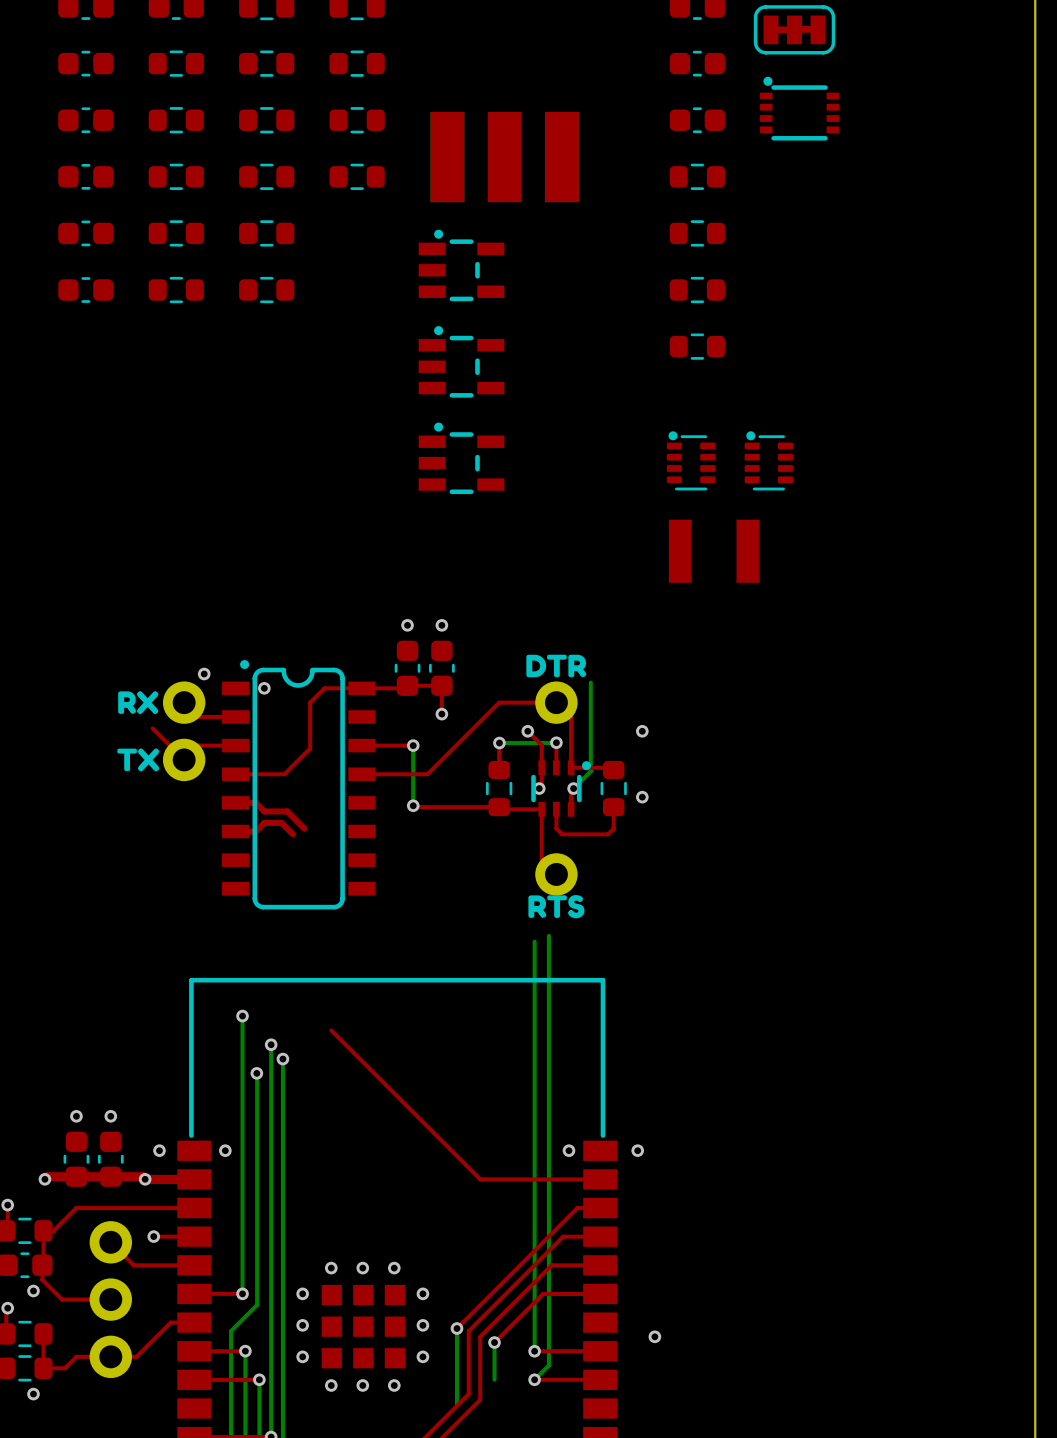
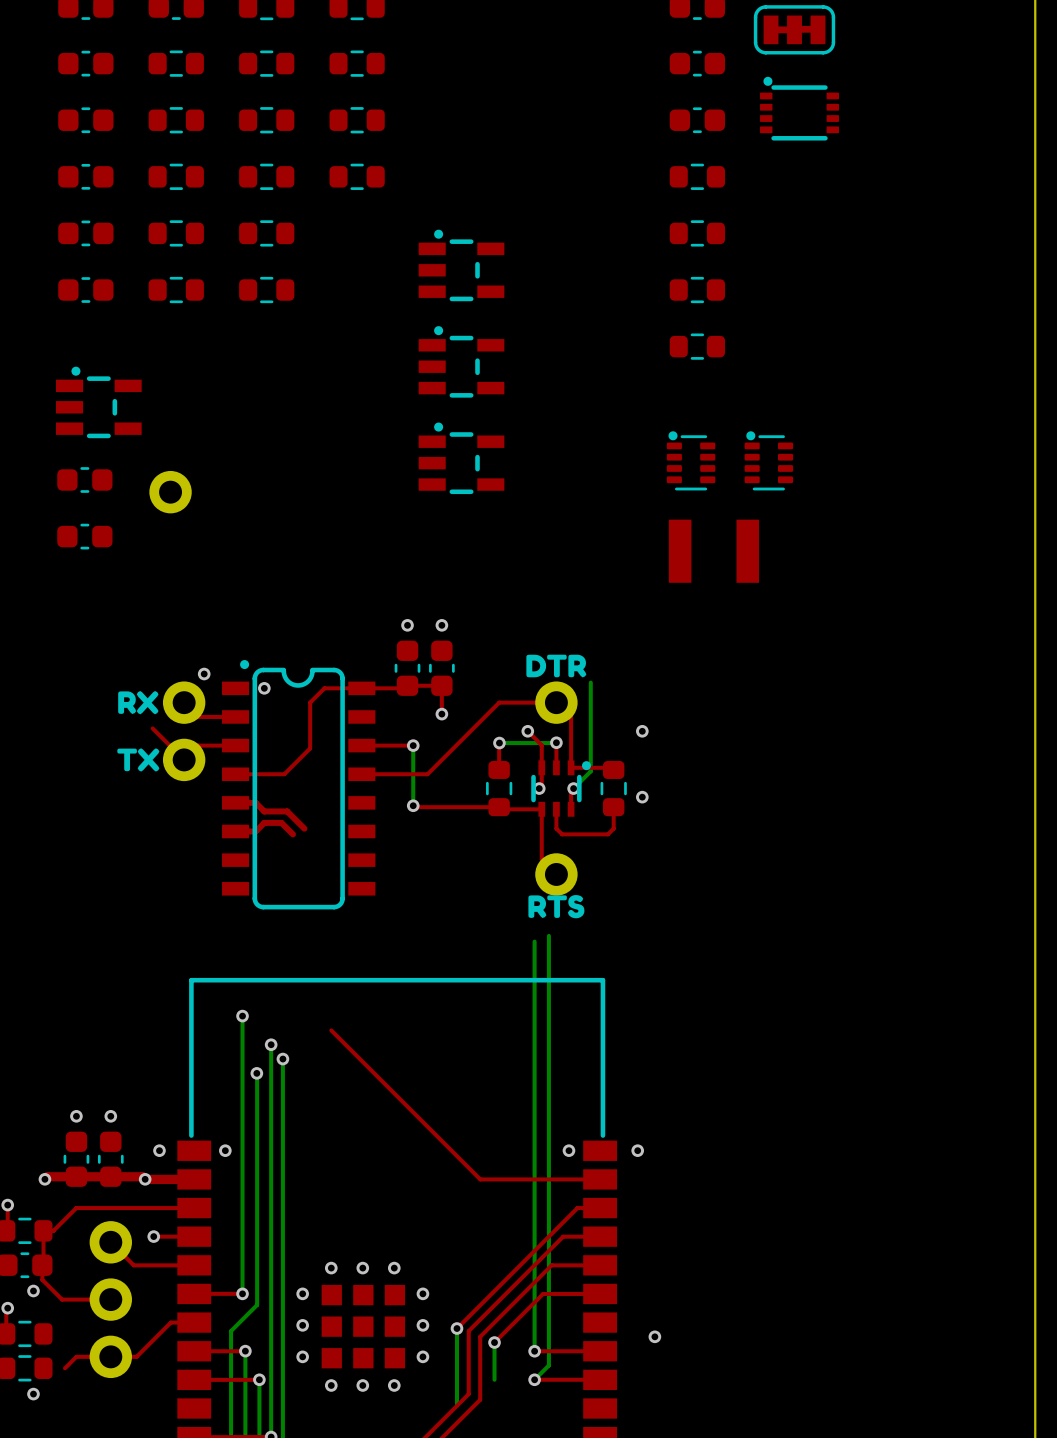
part: (504, 157) -> none
part: none -> (98, 402)
part: none -> (84, 479)
part: none -> (170, 492)
part: none -> (84, 536)
top track: (43, 1333) (43, 1368) (64, 1368) -> none

